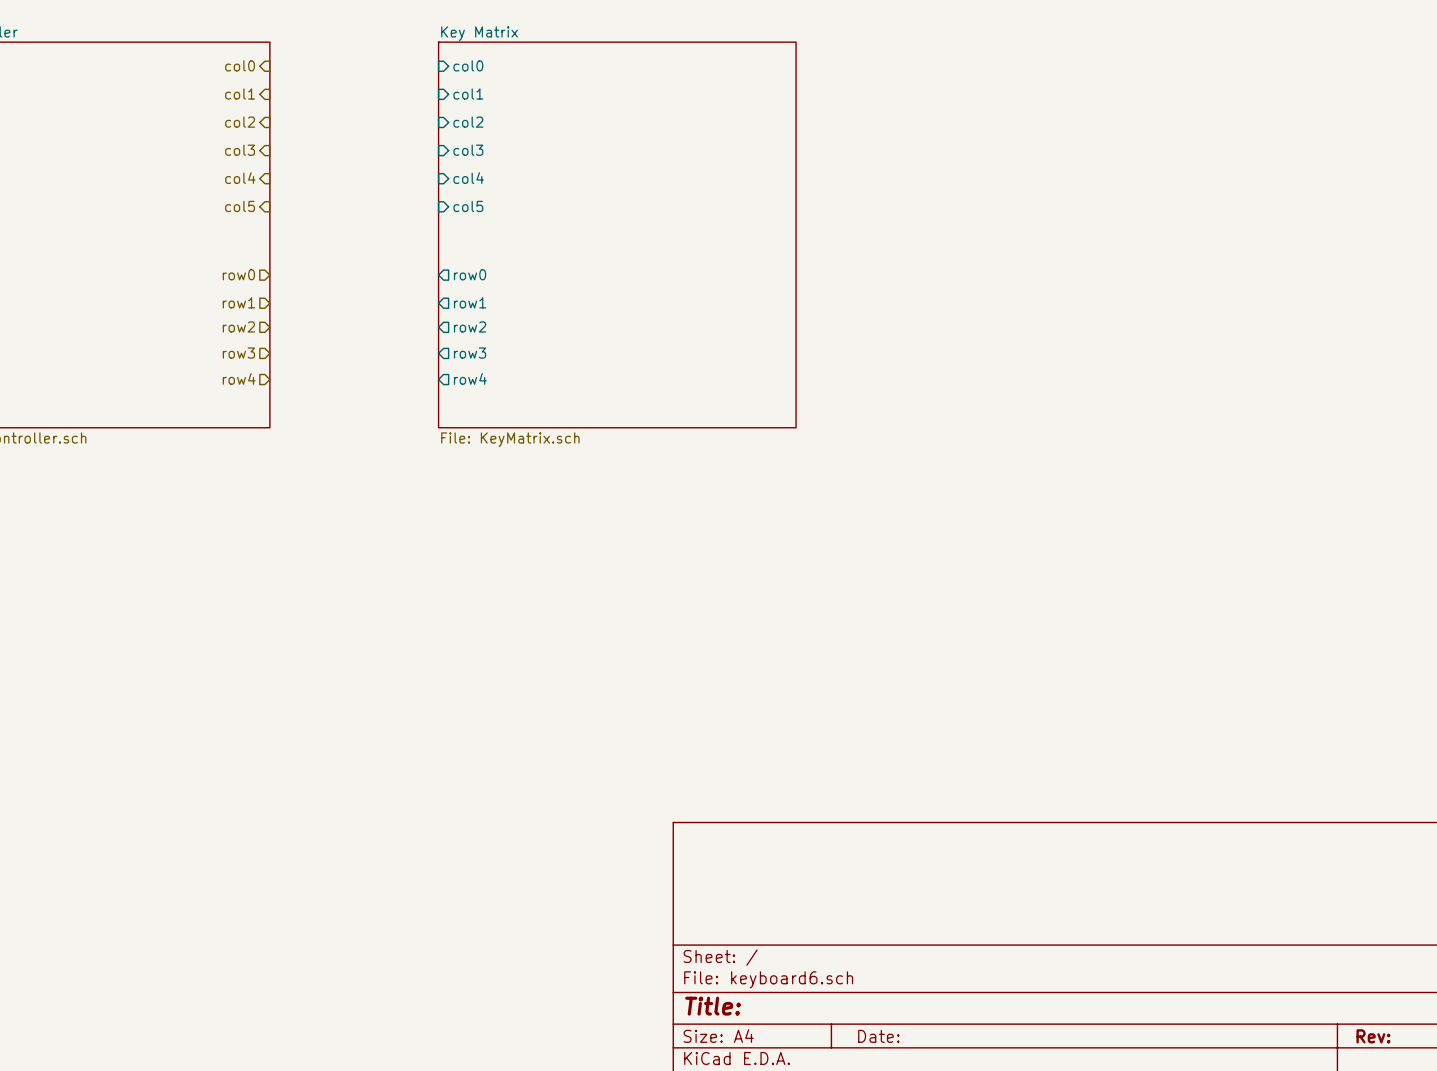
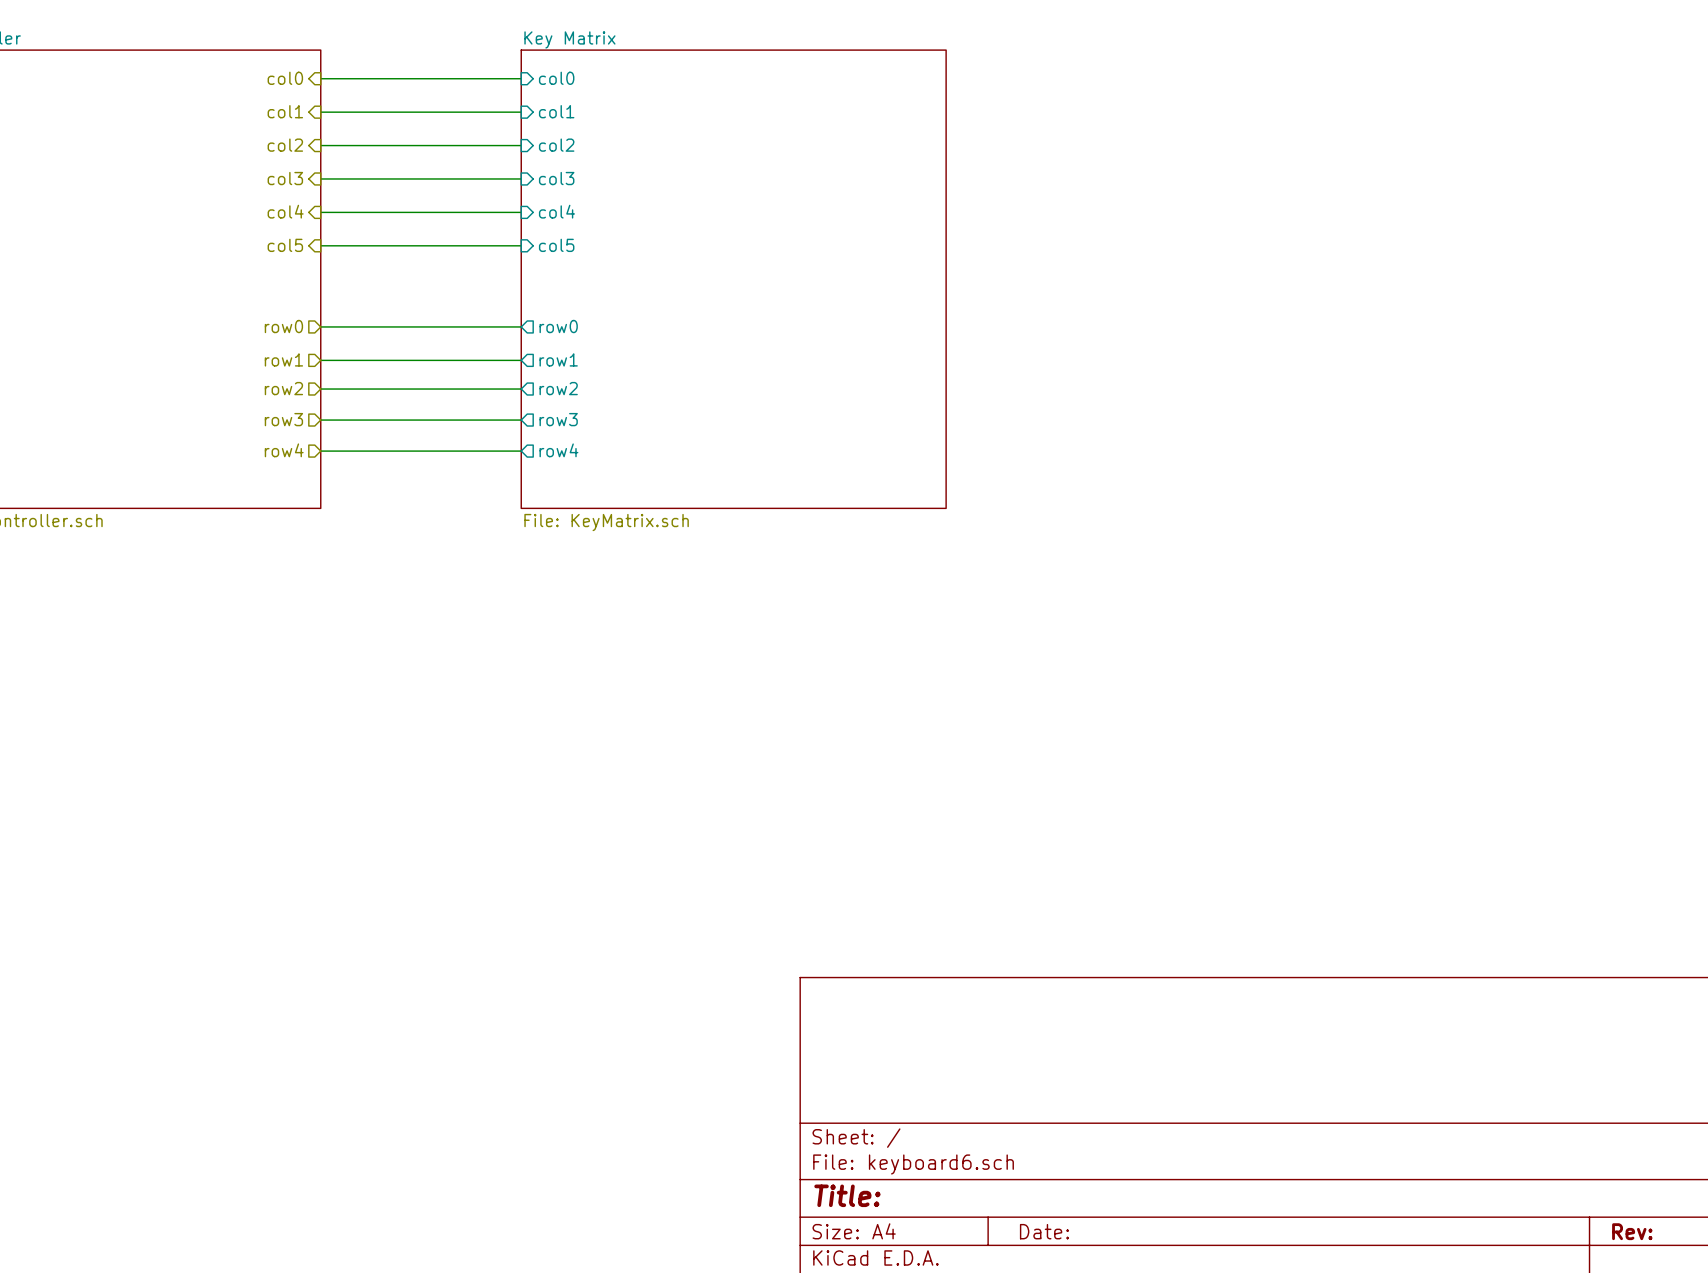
wire: none -> (320, 78) (521, 78)
wire: none -> (320, 112) (521, 112)
wire: none -> (320, 145) (521, 145)
wire: none -> (320, 178) (521, 178)
wire: none -> (320, 212) (521, 212)
wire: none -> (320, 245) (521, 245)
wire: none -> (320, 326) (521, 326)
wire: none -> (320, 360) (521, 360)
wire: none -> (320, 389) (521, 389)
wire: none -> (320, 420) (521, 420)
wire: none -> (320, 451) (521, 451)

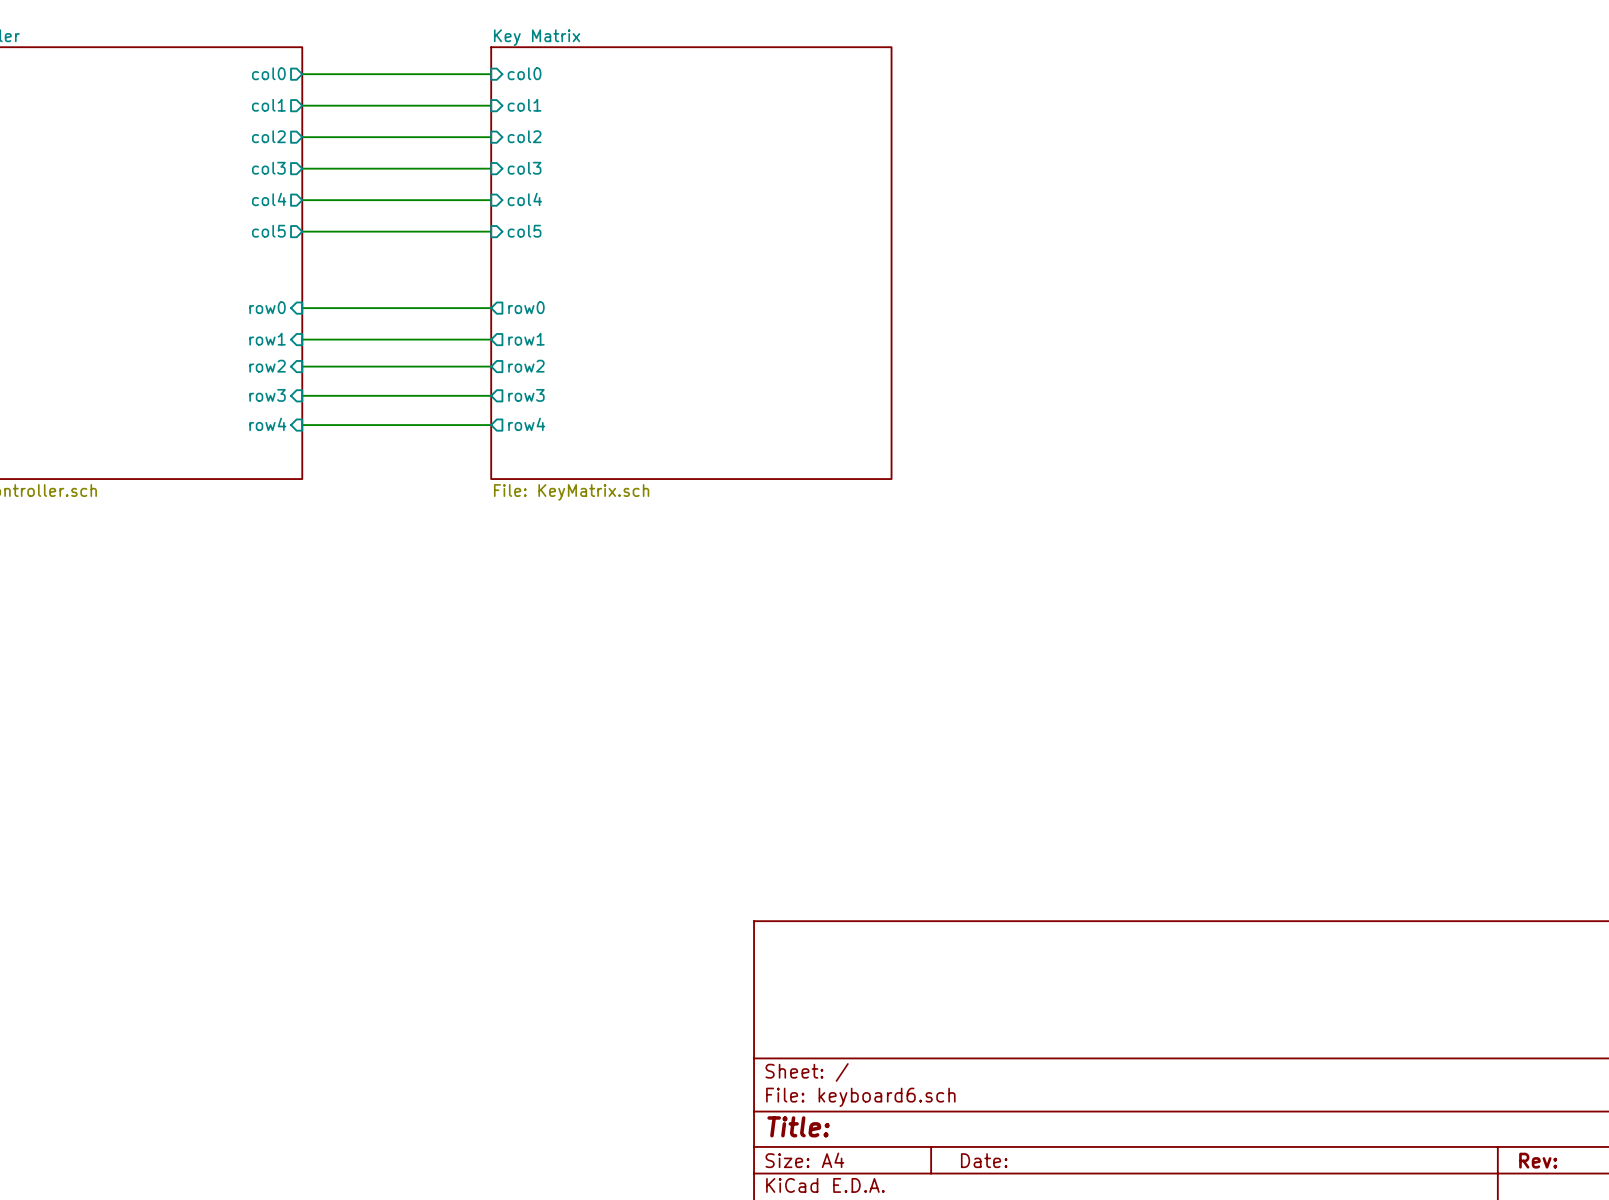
hierarchical label: col0 (285, 78) -> none
sheet pin: none -> col0 (268, 73)
hierarchical label: col1 (285, 111) -> none
sheet pin: none -> col1 (268, 105)
hierarchical label: col2 (285, 145) -> none
sheet pin: none -> col2 (268, 136)
hierarchical label: col3 (285, 178) -> none
sheet pin: none -> col3 (268, 168)
hierarchical label: col4 (285, 211) -> none
sheet pin: none -> col4 (269, 199)
hierarchical label: col5 (285, 245) -> none
sheet pin: none -> col5 (268, 231)
hierarchical label: row0 (283, 326) -> none
sheet pin: none -> row0 (267, 307)
hierarchical label: row1 (283, 359) -> none
sheet pin: none -> row1 (267, 339)
hierarchical label: row2 (283, 388) -> none
sheet pin: none -> row2 (267, 366)
hierarchical label: row3 (283, 419) -> none
sheet pin: none -> row3 (267, 395)
hierarchical label: row4 (284, 450) -> none
sheet pin: none -> row4 (267, 424)

